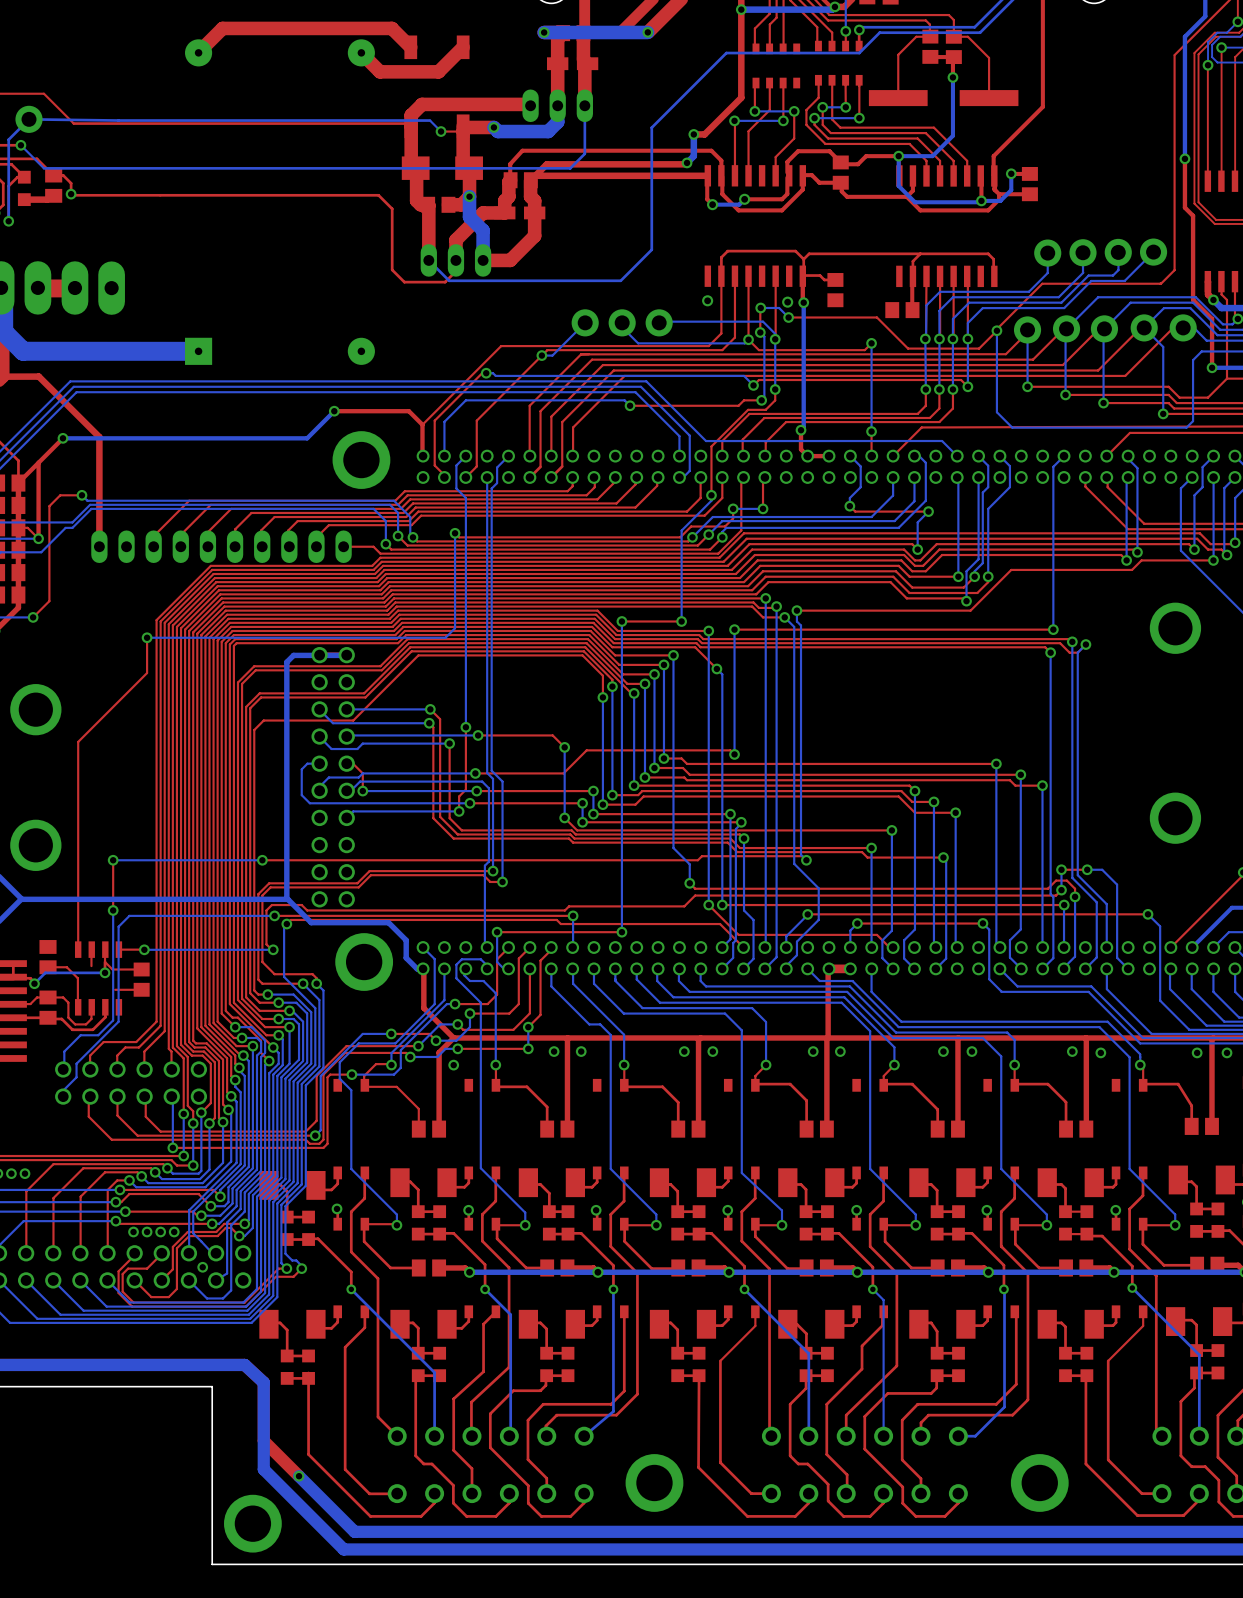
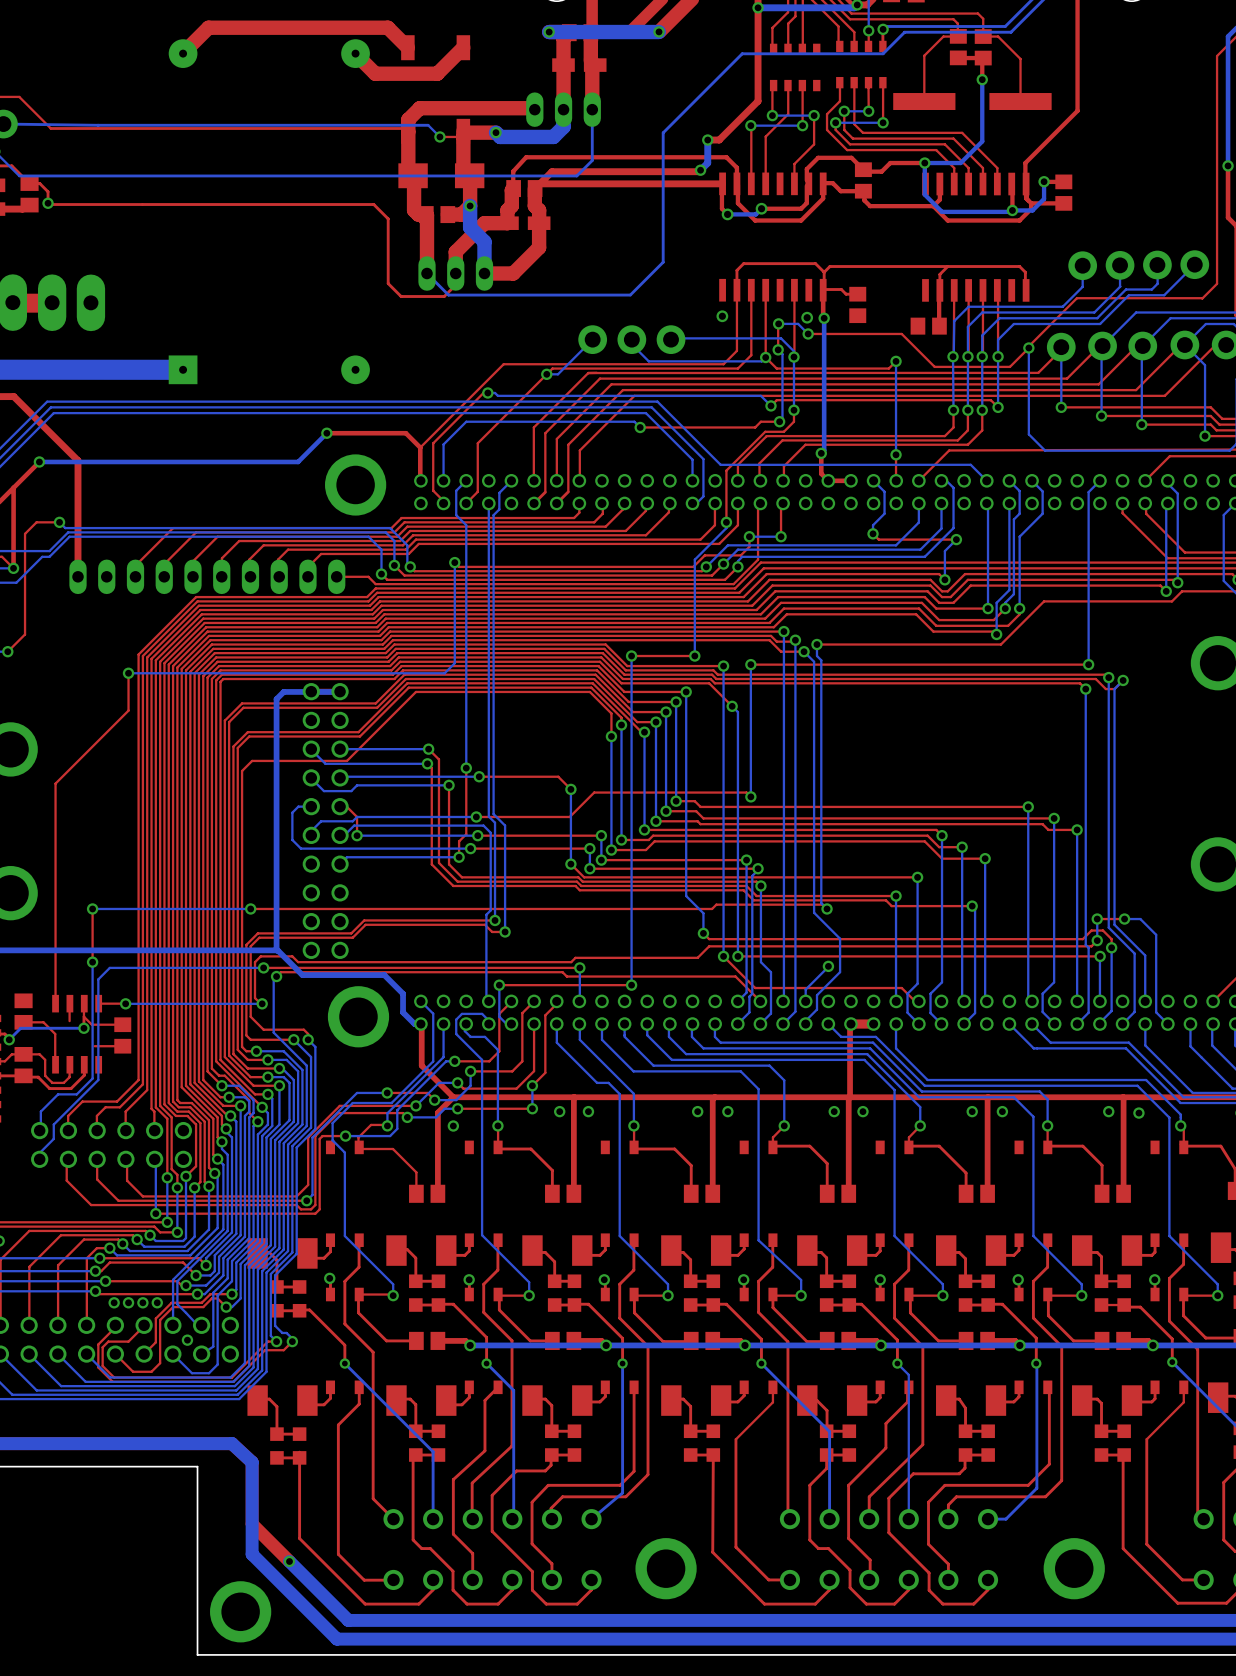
top track: (1147, 914) (807, 914) -> none
bottom track: (1147, 914) (1160, 926) (1160, 1000) -> (1190, 1024) (1190, 1046) (1201, 1057)
via: (1147, 914) -> none
bottom track: (857, 923) (850, 930) (850, 947) -> none
via: (857, 923) -> none
top track: (982, 923) (857, 923) -> none
bottom track: (982, 923) (989, 929) (989, 979) (1001, 991) -> (1009, 1024) (1033, 1048)
via: (982, 923) -> none

